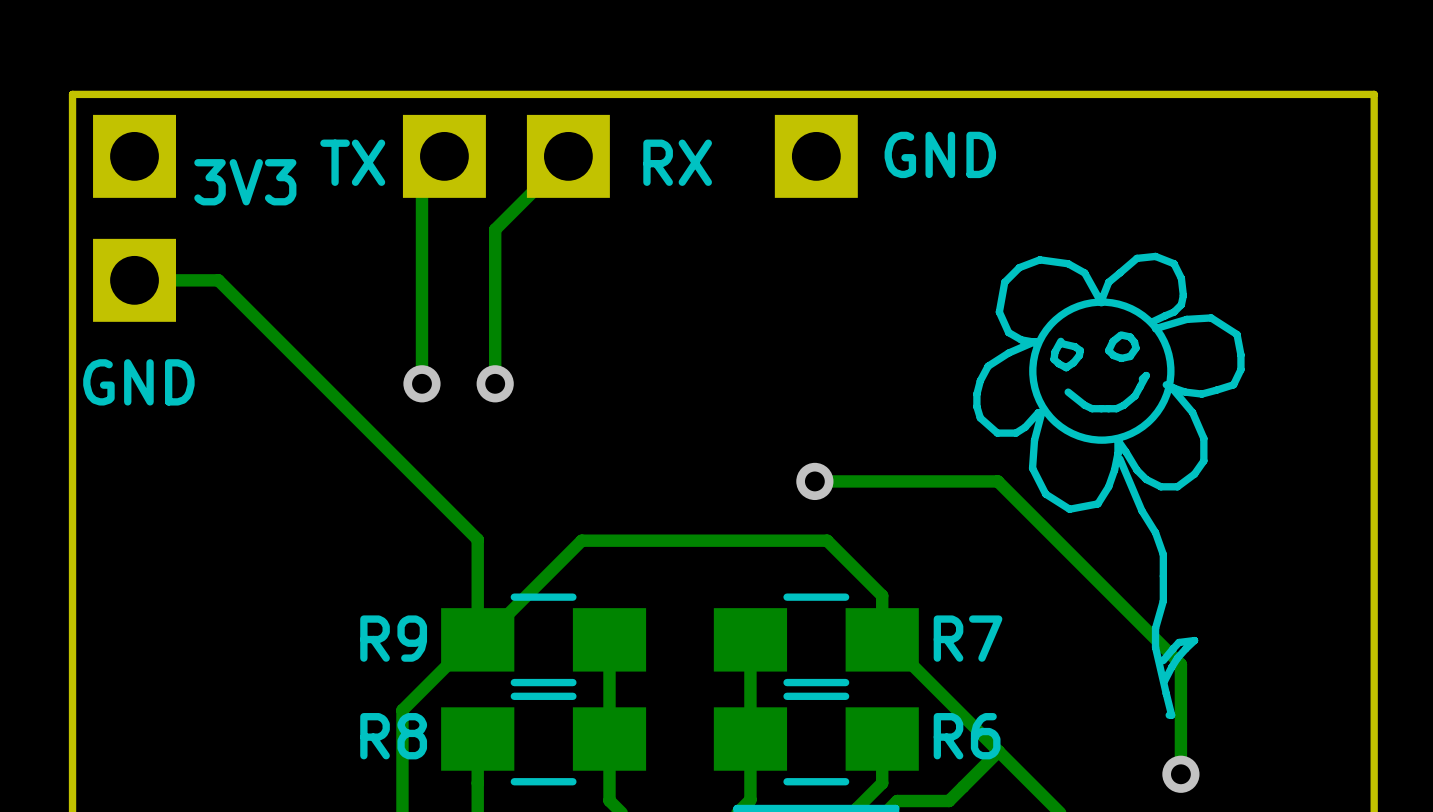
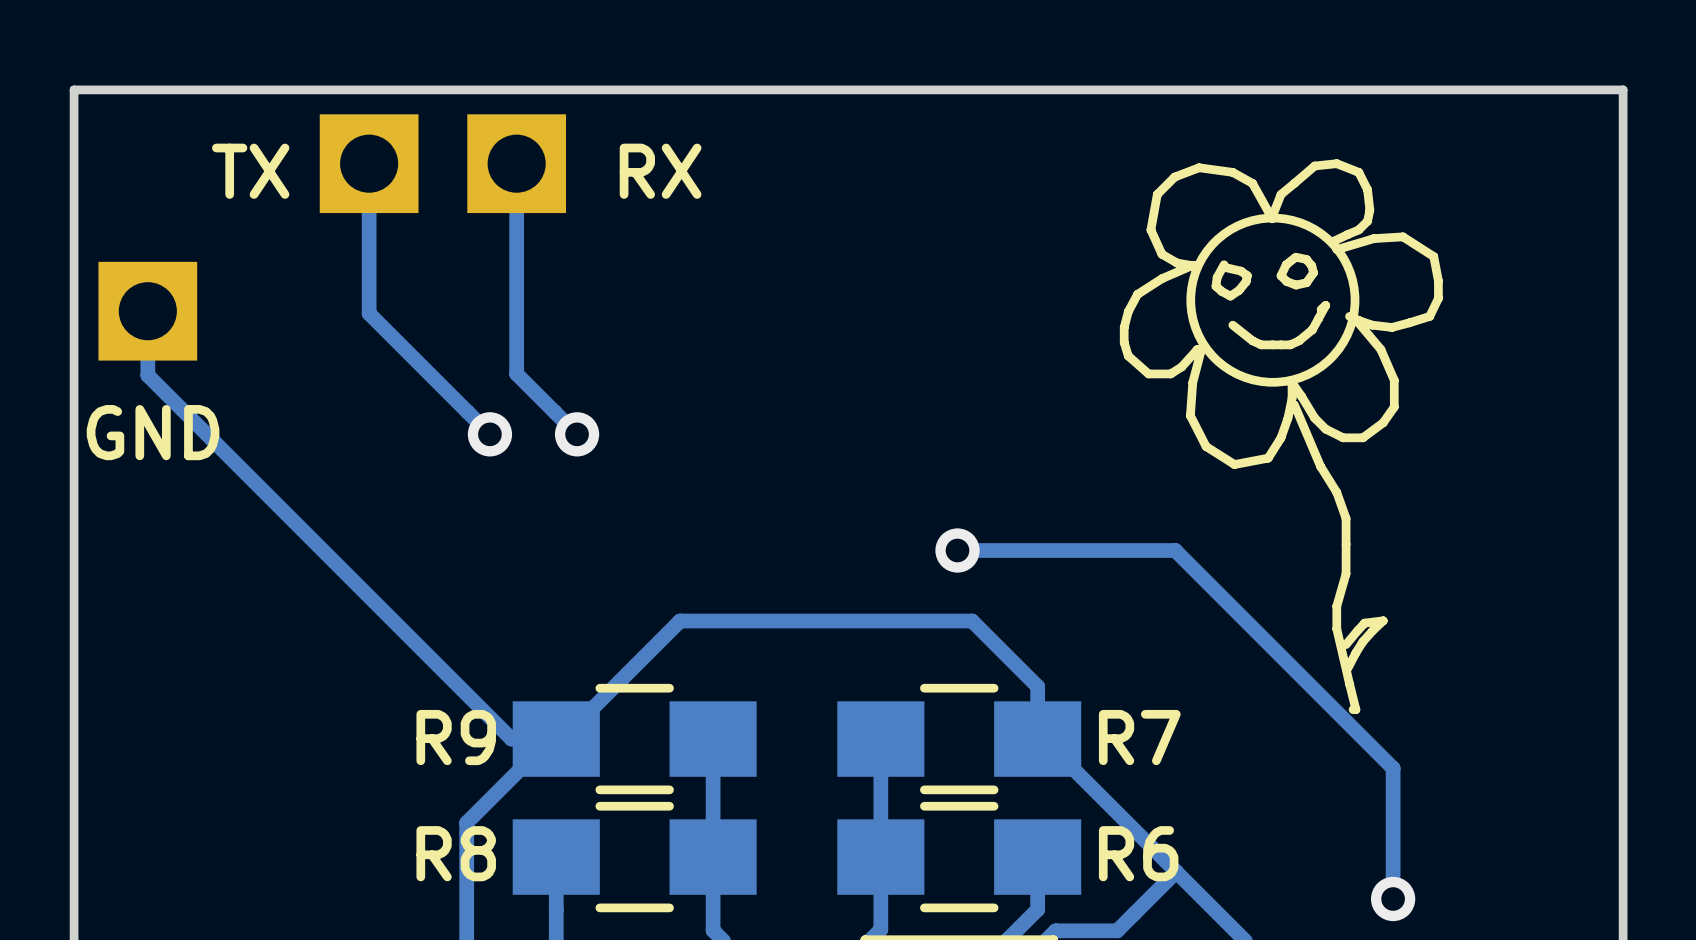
text: GND (940, 154) -> none
part: (134, 156) -> none
track: none -> (369, 163) (369, 313) (489, 434)
part: none -> (369, 163)
track: (444, 156) (421, 178) (421, 383) -> (516, 163) (516, 373) (577, 434)
track: (568, 156) (495, 229) (495, 383) -> none
part: (568, 156) -> none
part: (816, 156) -> none
text position: TX (352, 162) -> TX (250, 171)
text position: RX (677, 162) -> RX (660, 171)
text: 3V3 (245, 182) -> none
track: (134, 280) (218, 280) (477, 539) (477, 639) -> (147, 311) (147, 375) (511, 739) (550, 739)
drawing position: (1108, 485) -> (1281, 436)

